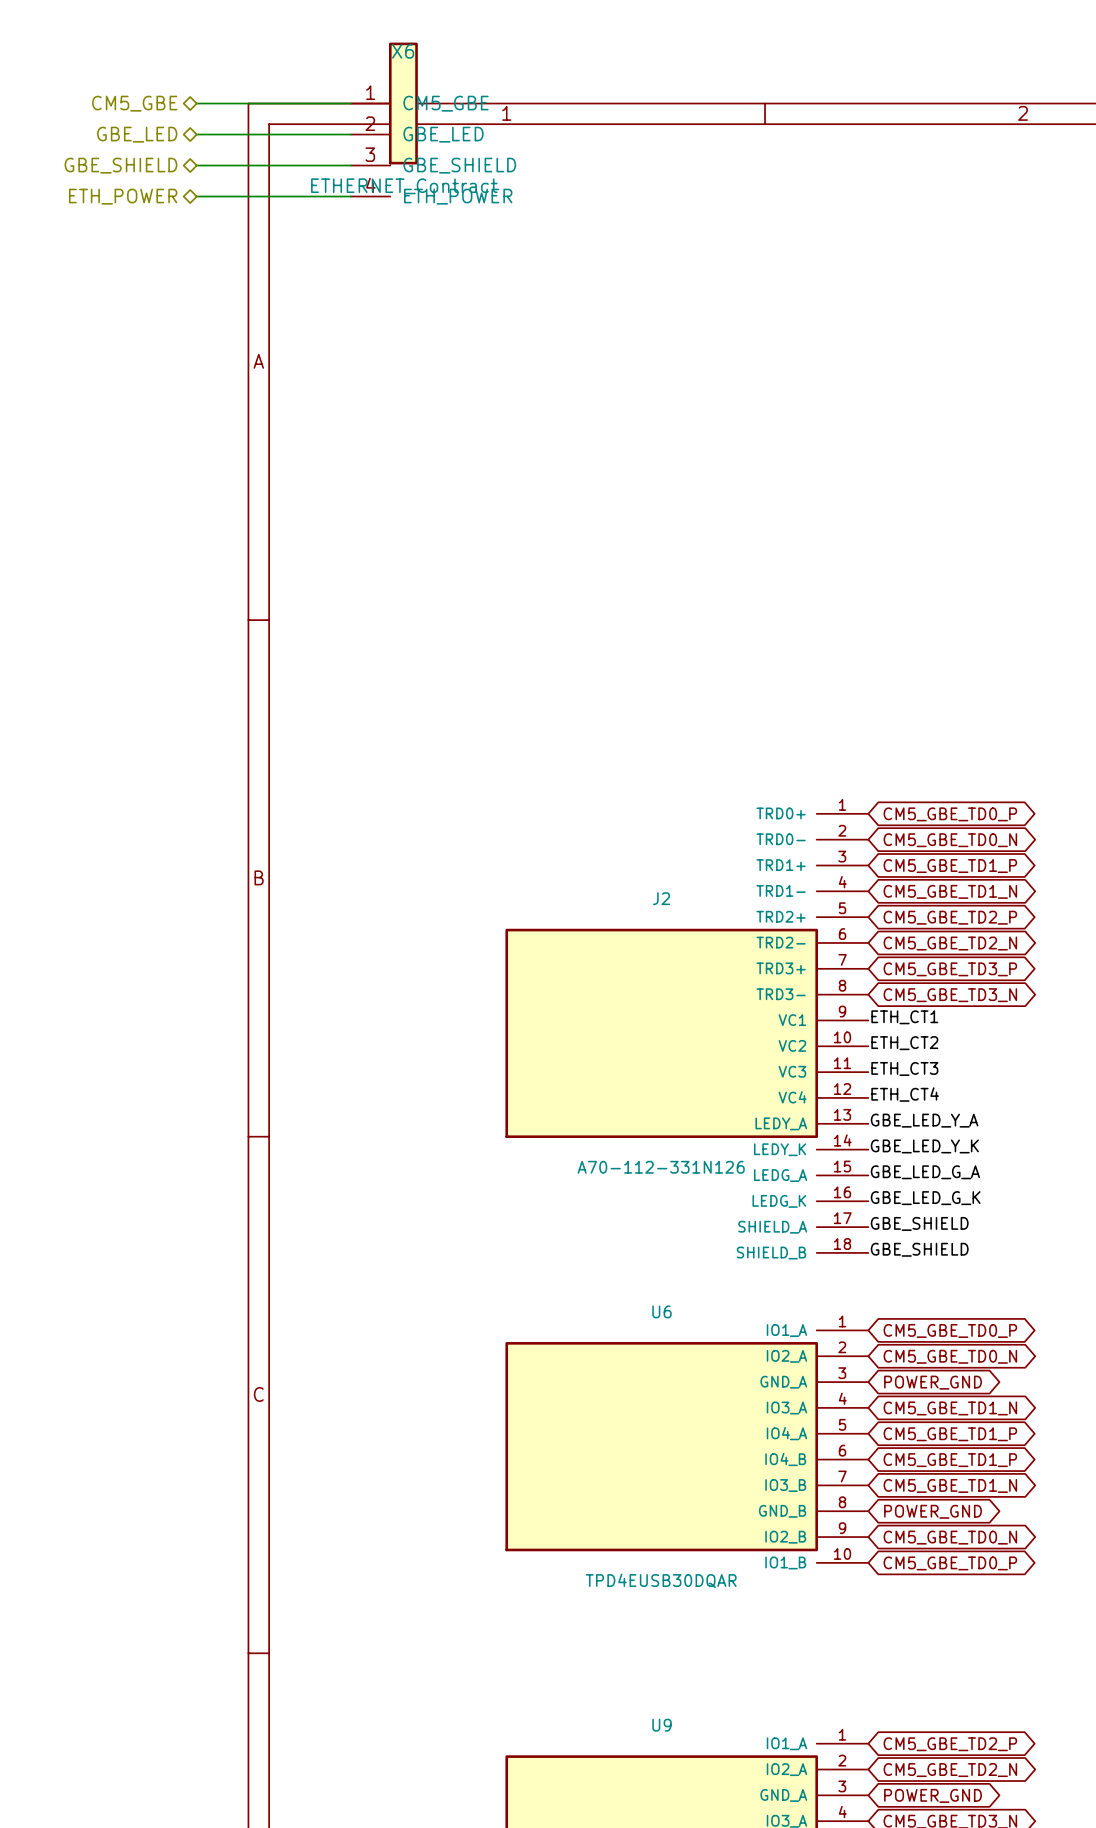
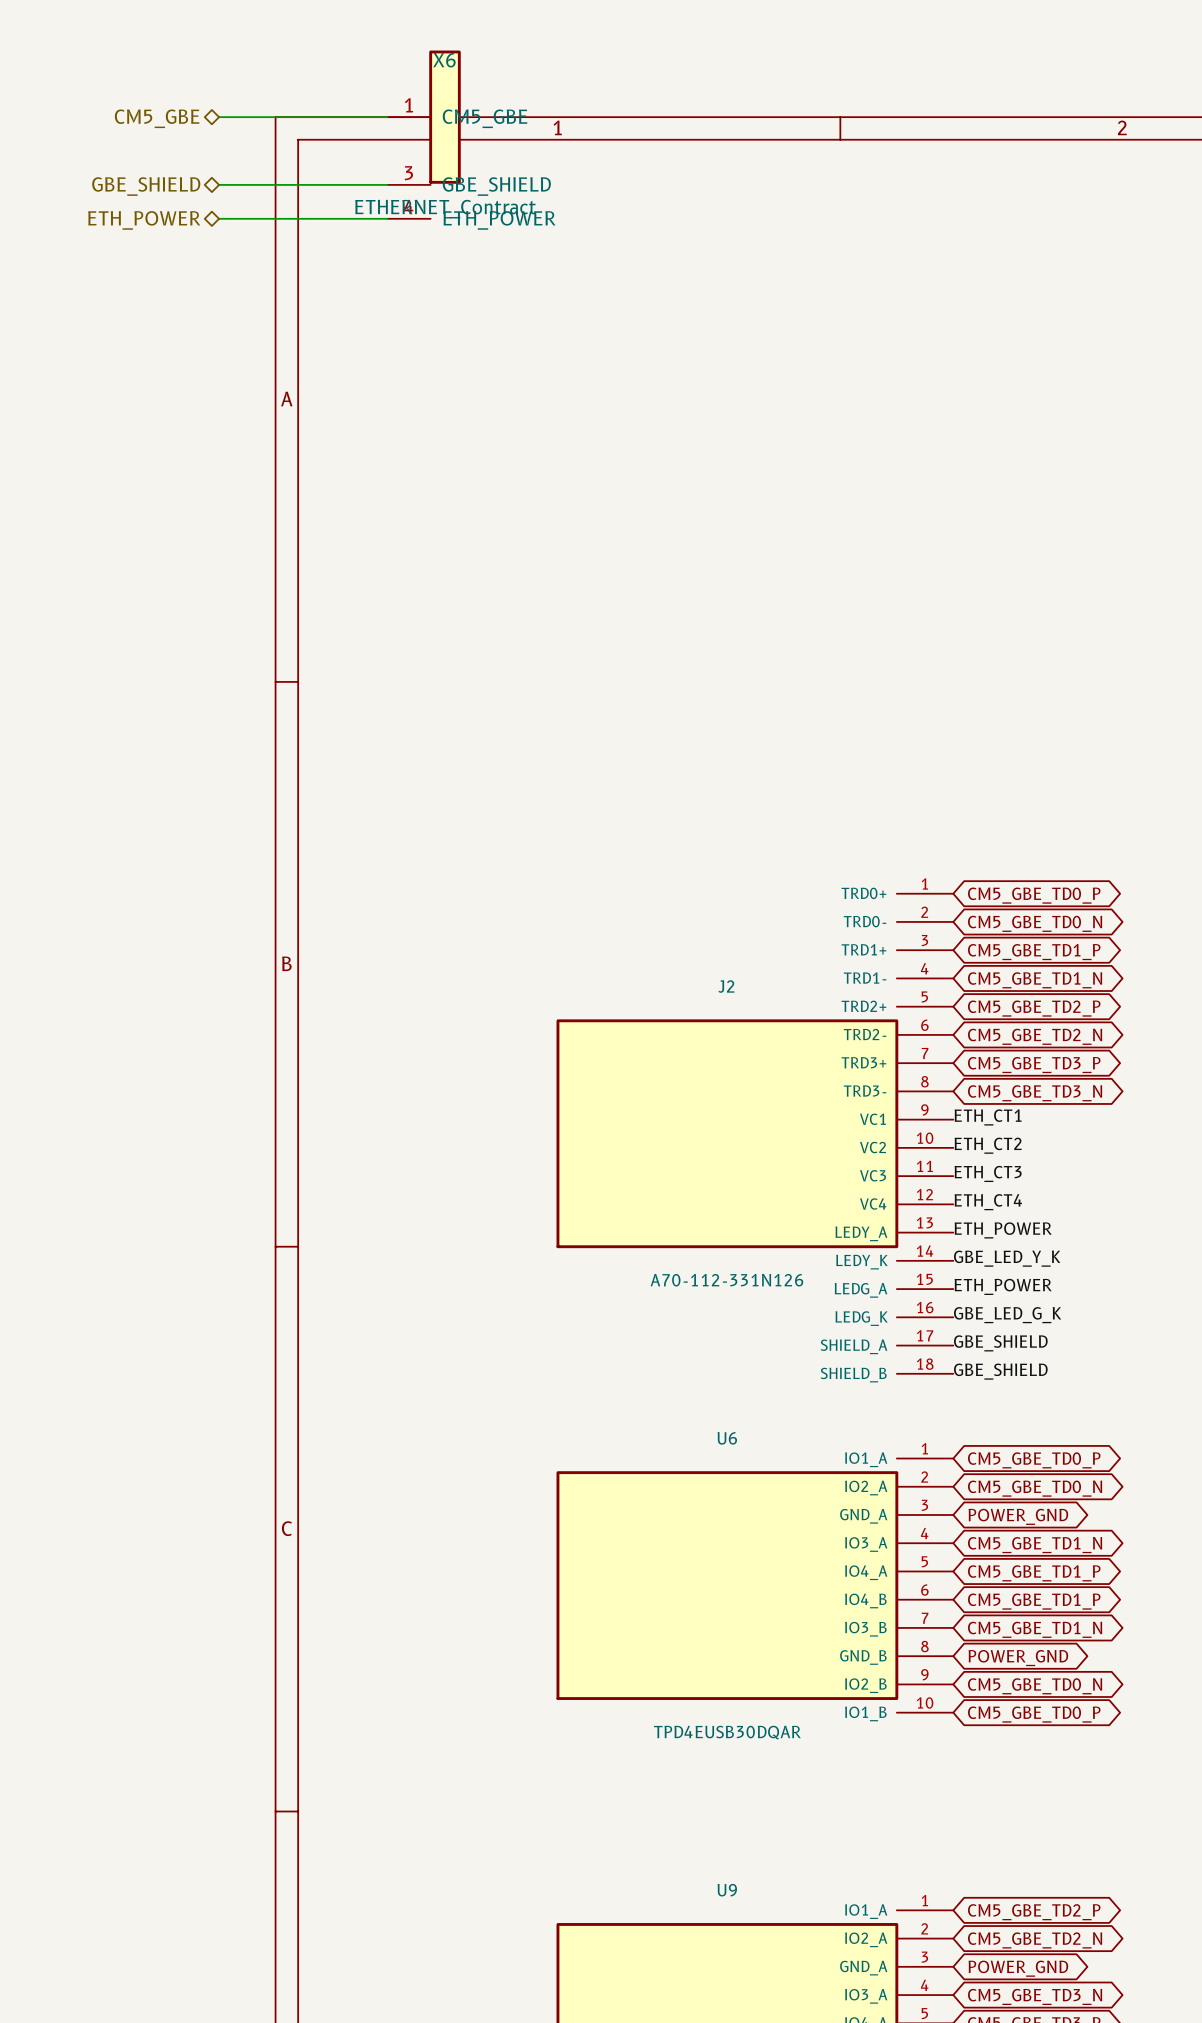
X6 symbol: [350, 42, 418, 197] -> [387, 50, 461, 219]
hierarchical label: GBE_LED (137, 134) -> none
wire: (196, 134) (350, 134) -> none
label: GBE_LED_Y_A (924, 1120) -> ETH_POWER (1003, 1230)
label: GBE_LED_G_A (925, 1172) -> ETH_POWER (1003, 1286)

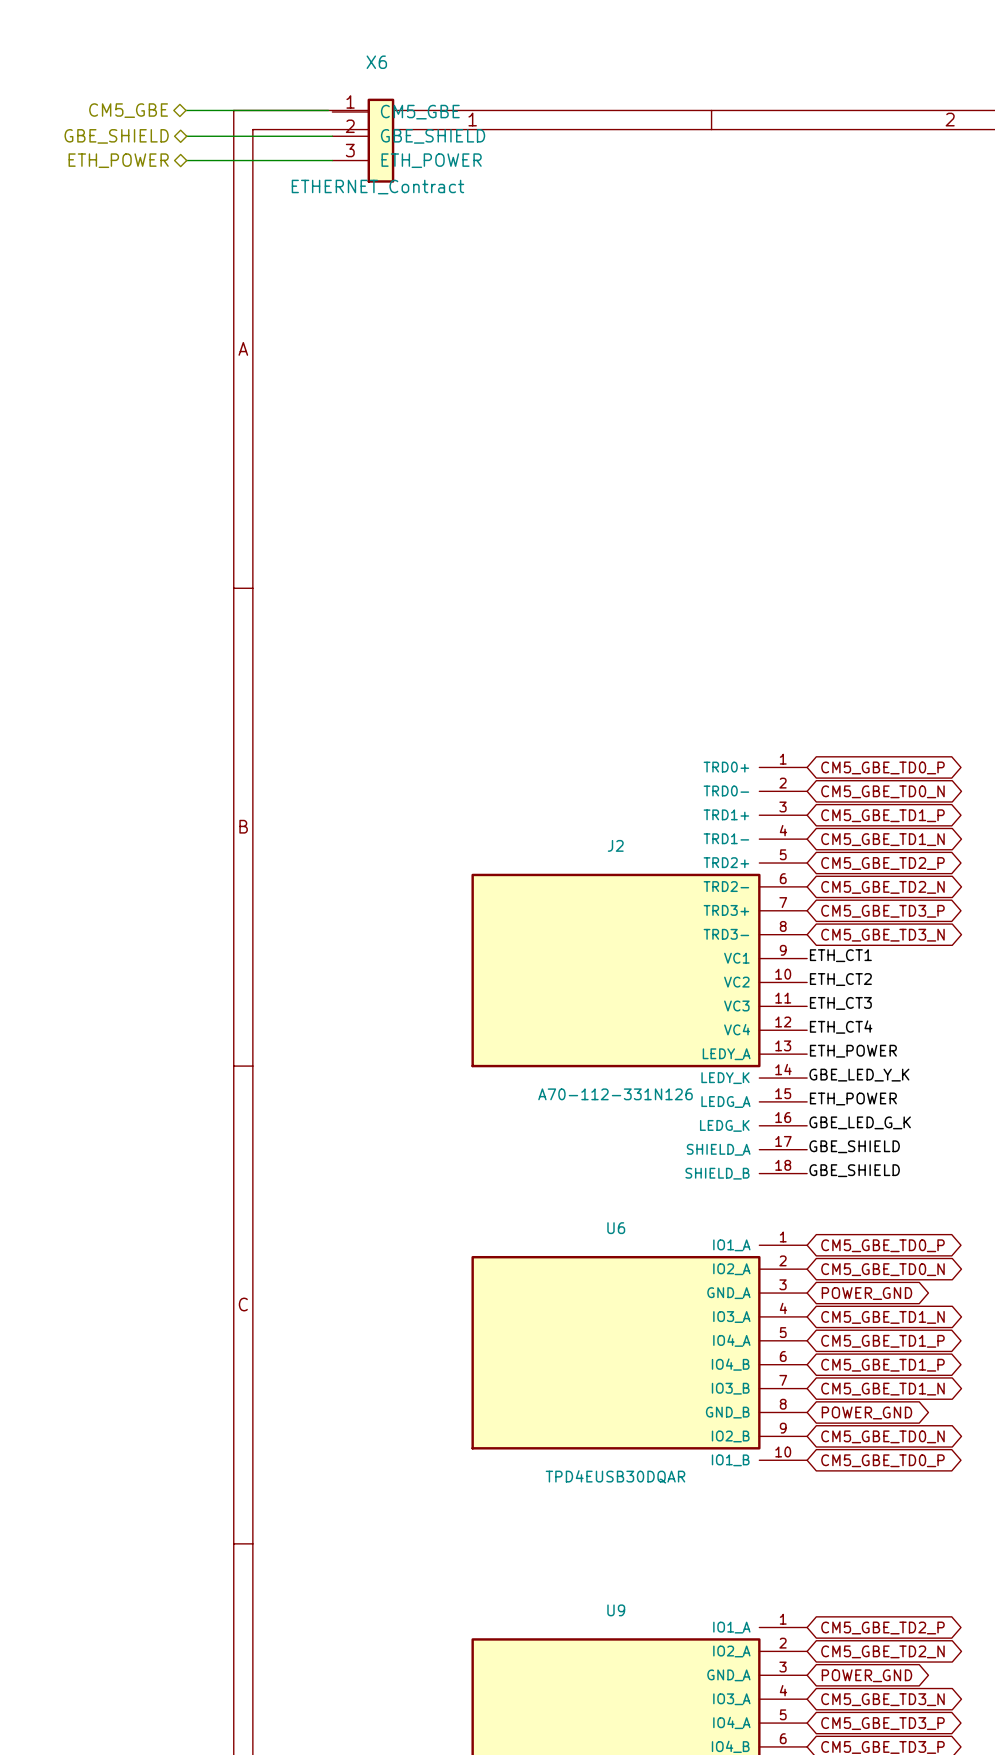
X6 symbol: [387, 50, 461, 219] -> [332, 98, 395, 183]
wire: none -> (186, 136) (332, 136)
hierarchical label: none -> GBE_SHIELD (116, 136)
wire: none -> (186, 160) (332, 160)
wire: (219, 184) (387, 184) -> none
hierarchical label: GBE_SHIELD (146, 186) -> ETH_POWER (118, 160)
wire: (219, 218) (387, 218) -> none
hierarchical label: ETH_POWER (144, 220) -> none

